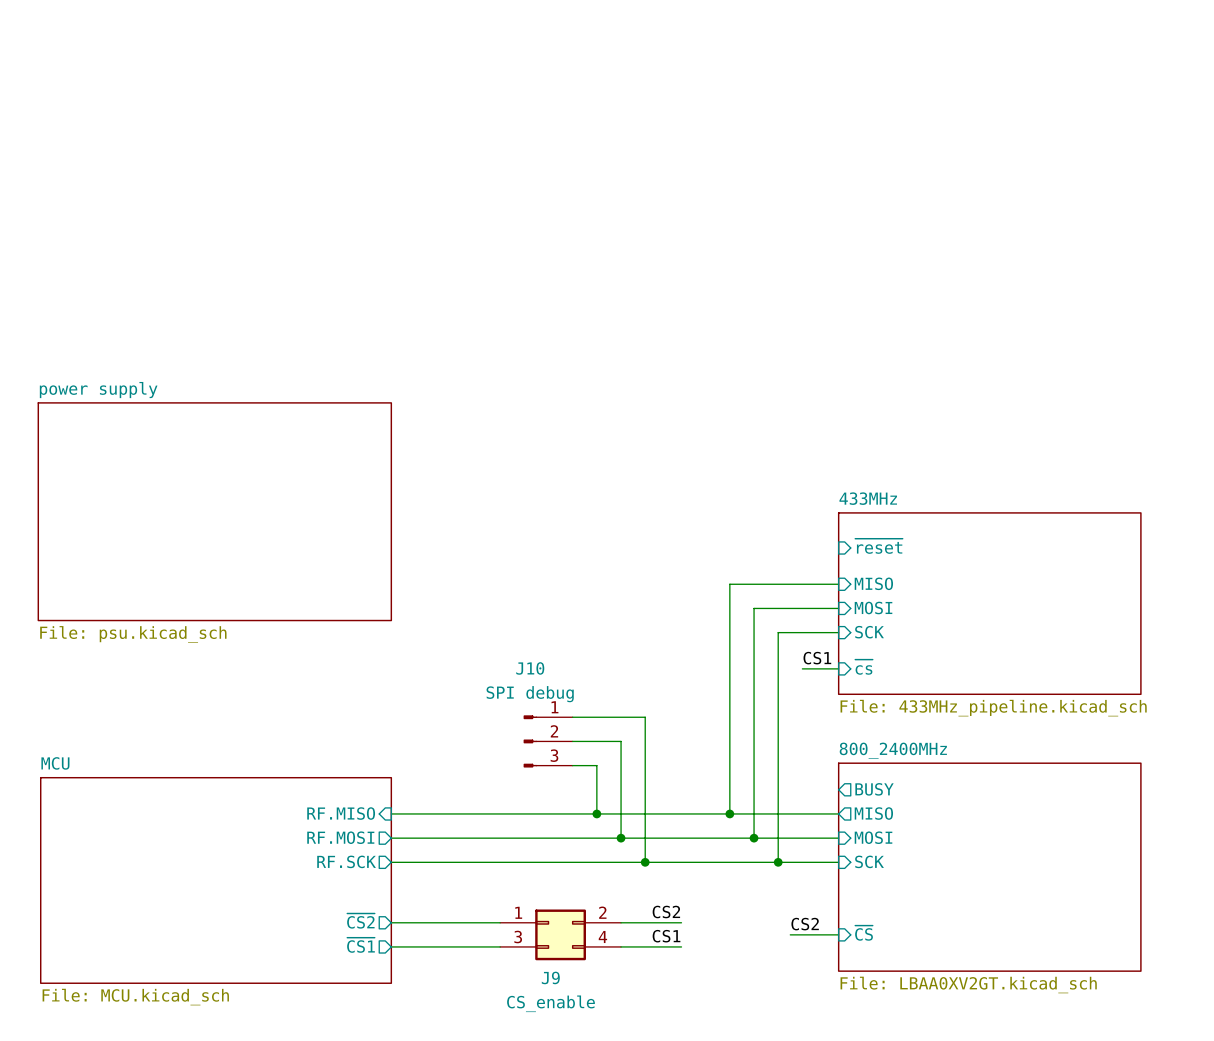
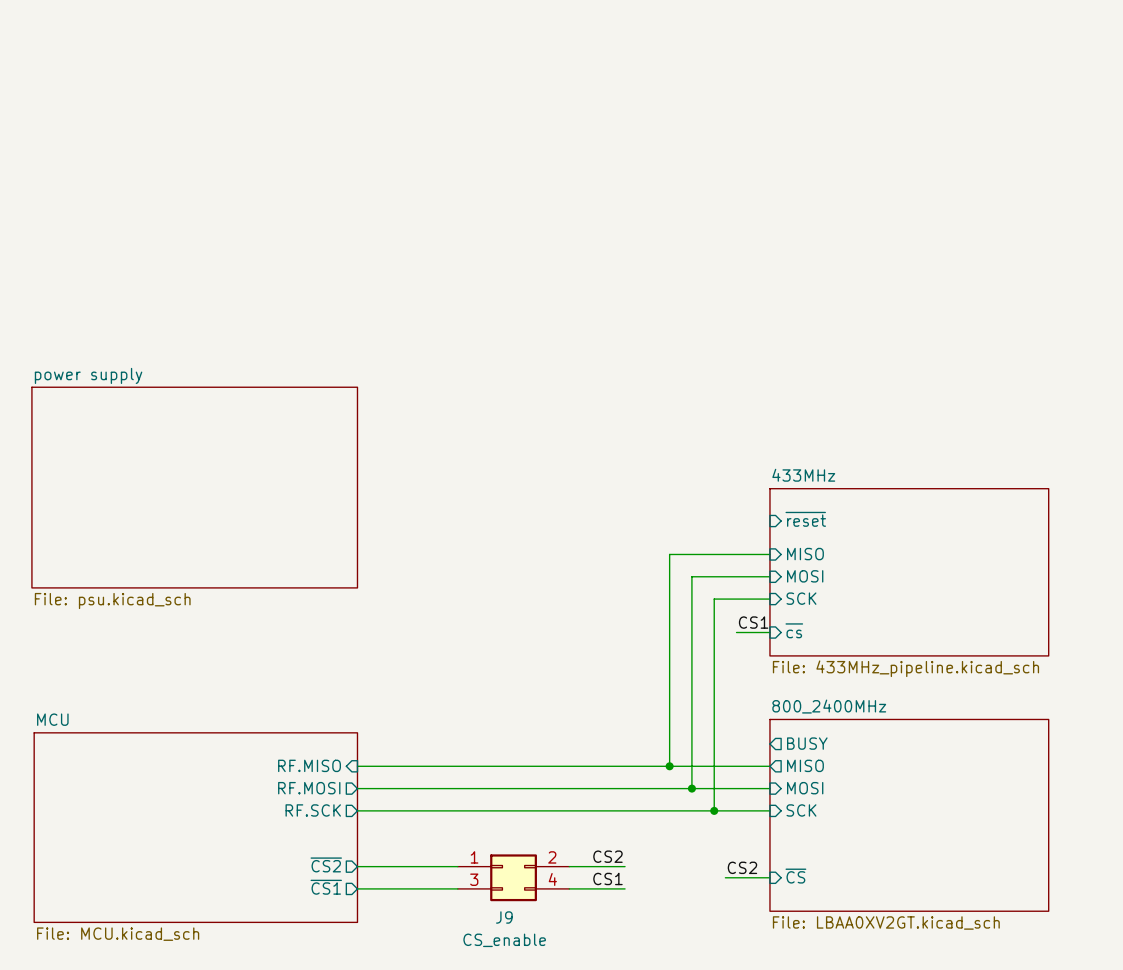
wire: (572, 717) (645, 717) (645, 862) -> none
J10: SPI debug (548, 741) -> none
wire: (572, 741) (621, 741) (621, 838) -> none
wire: (572, 765) (596, 765) (596, 813) -> none
junction: (596, 813) -> none
junction: (621, 838) -> none
junction: (645, 862) -> none

